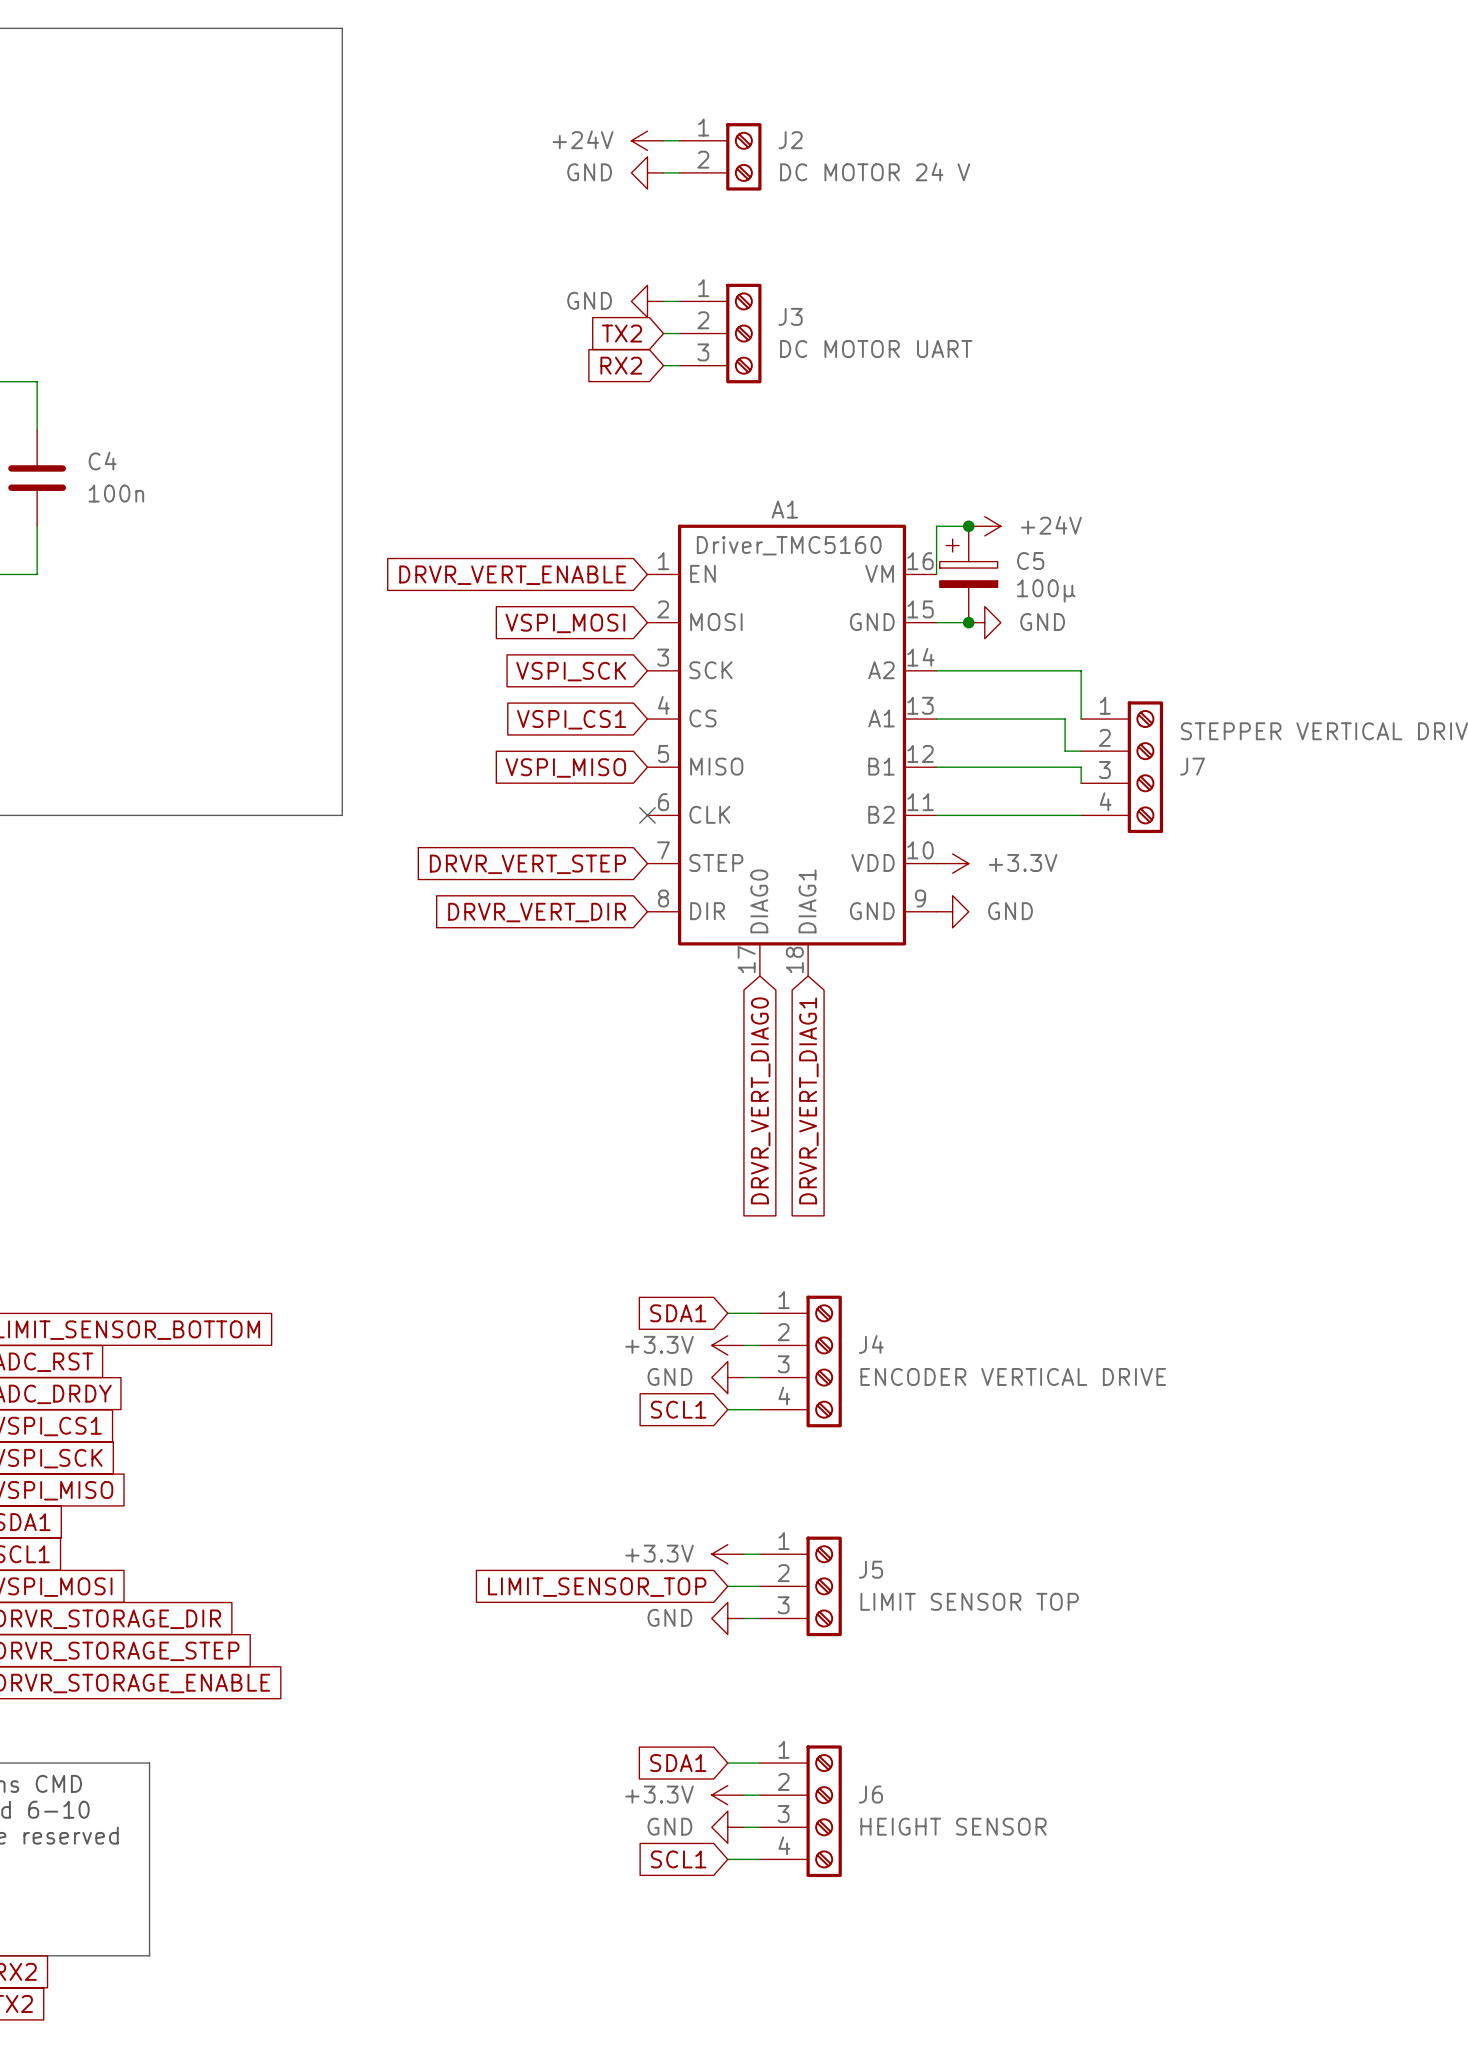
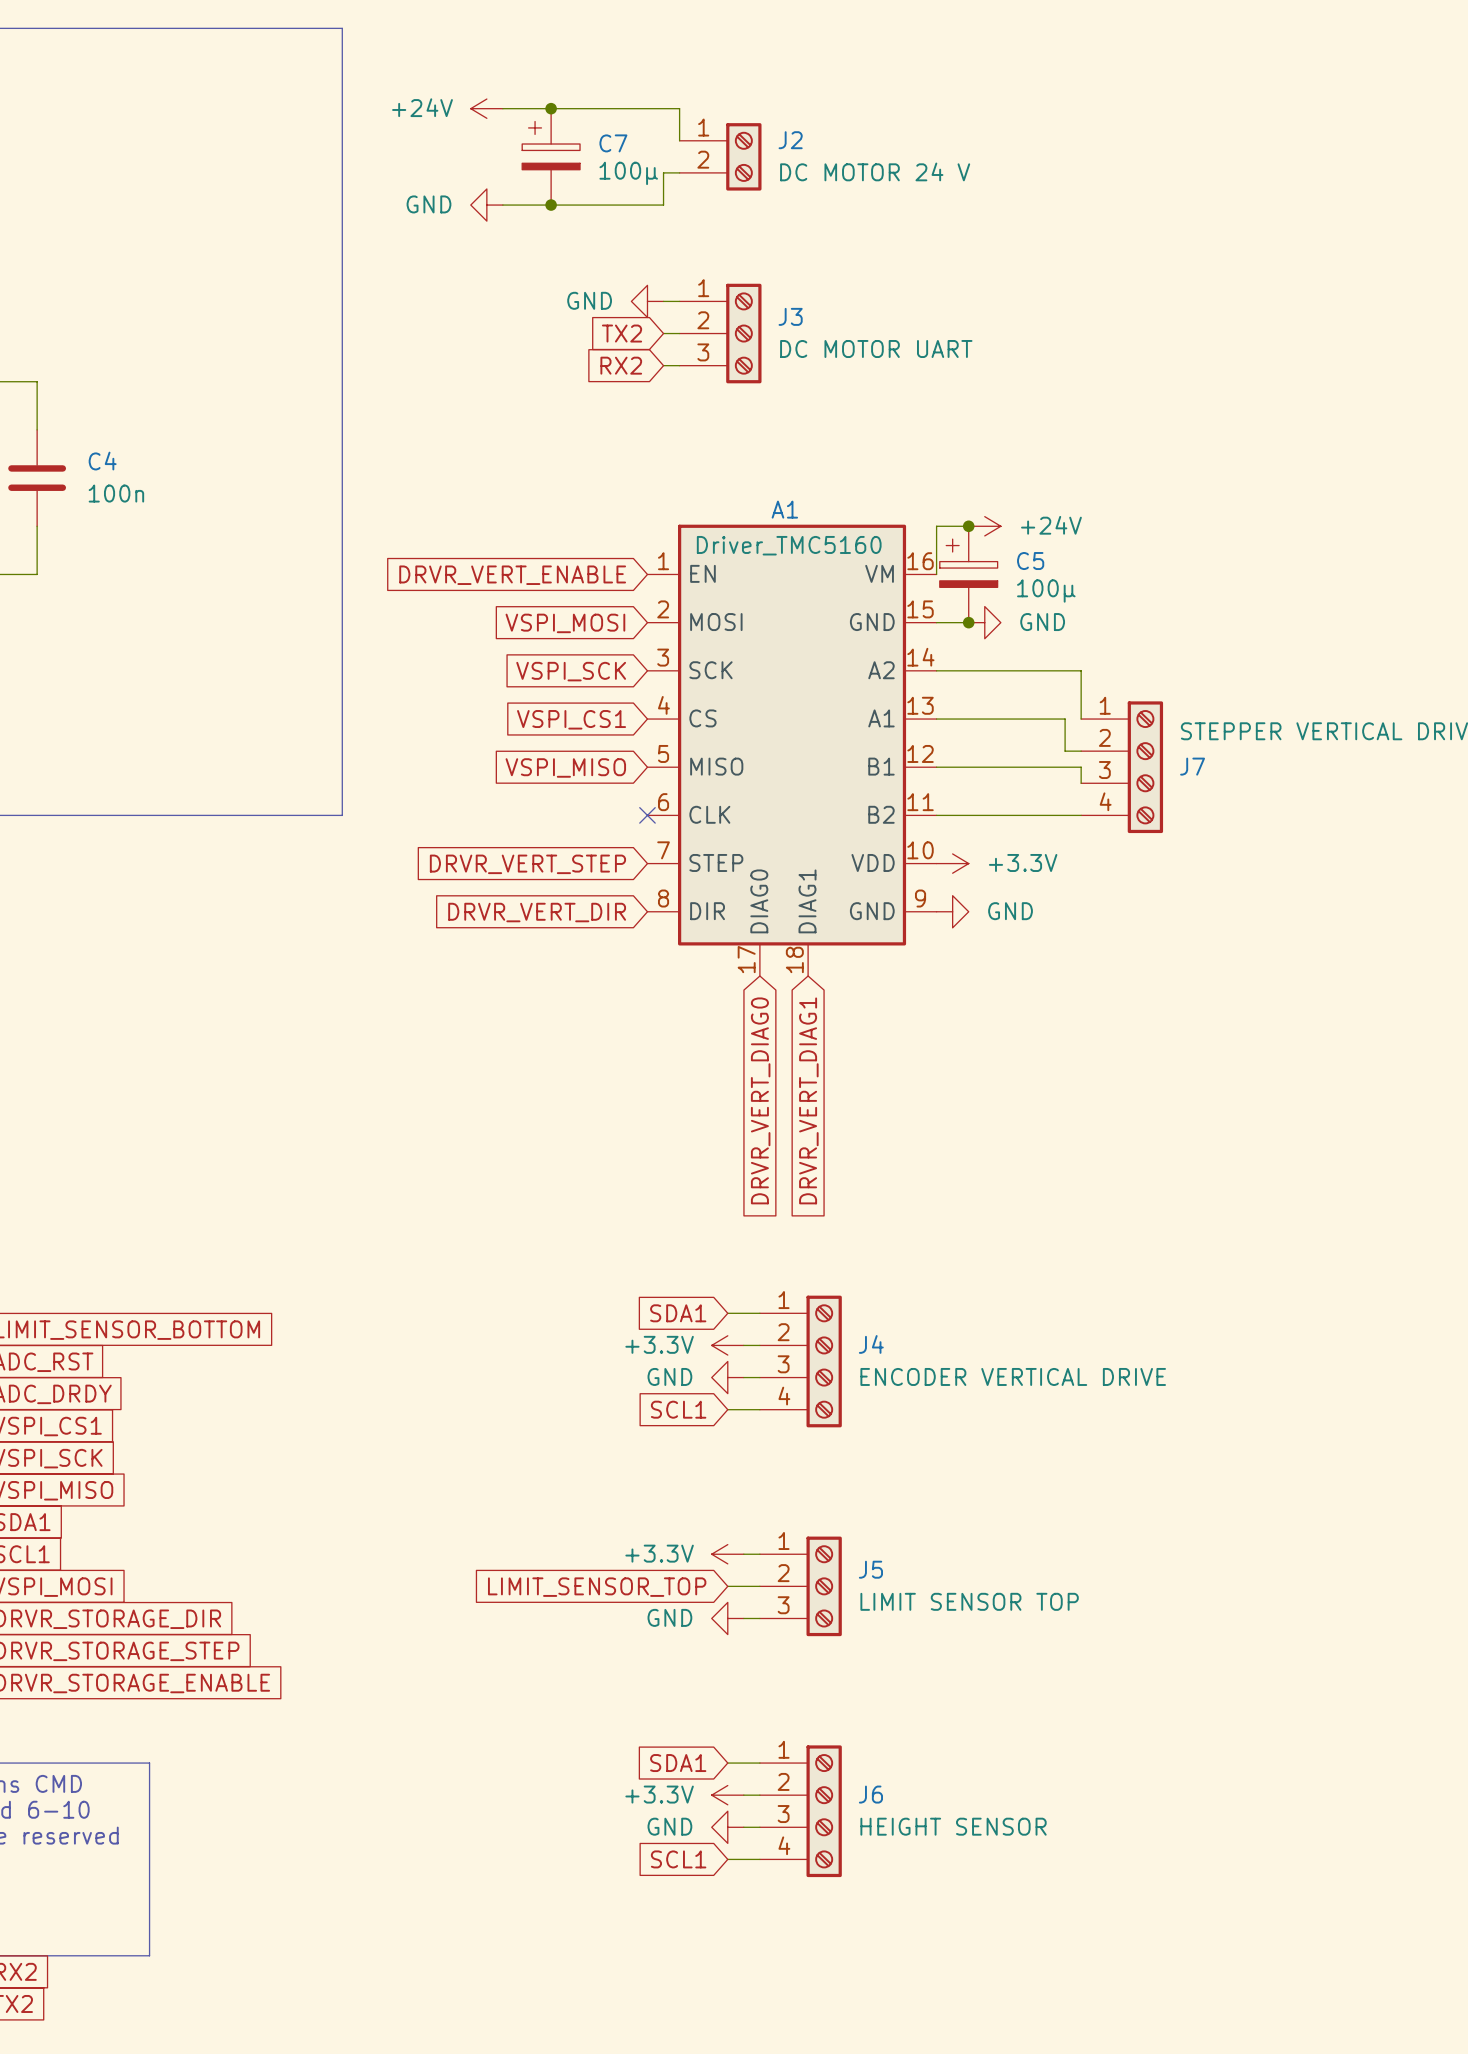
junction: none -> (551, 108)
power symbol position: +24V (647, 140) -> +24V (486, 108)
wire: (663, 140) (679, 140) -> (502, 108) (679, 108) (679, 140)
C7: none -> 100μ (551, 156)
power symbol position: GND (647, 172) -> GND (486, 205)
wire: none -> (663, 172) (663, 205) (502, 205)
junction: none -> (551, 205)

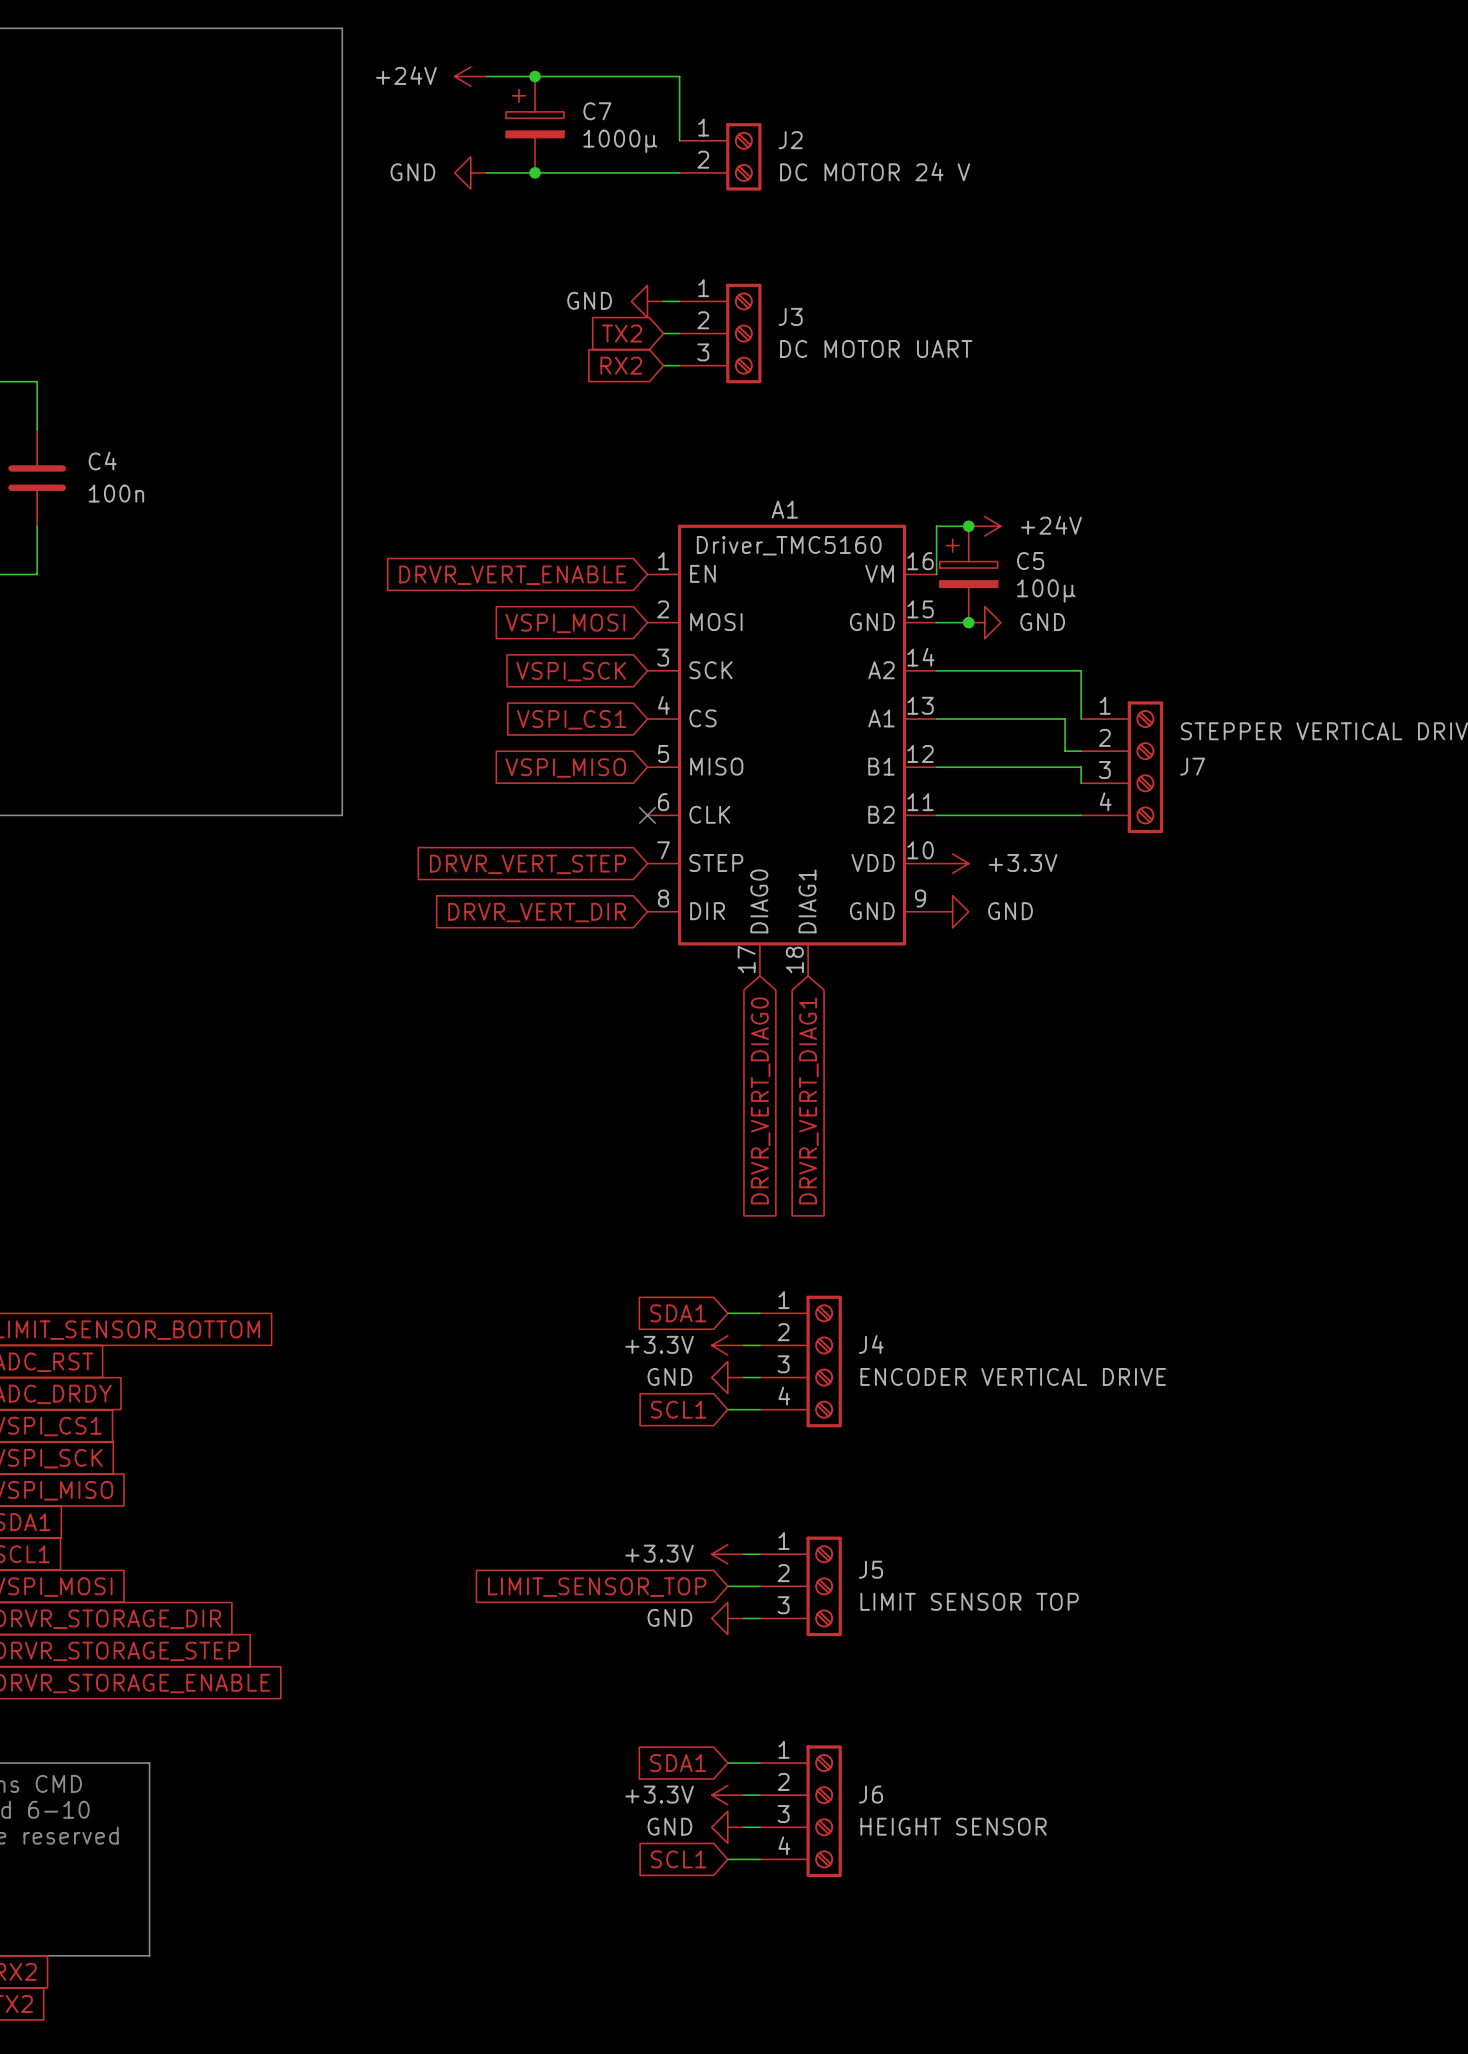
junction: none -> (535, 76)
power symbol position: +24V (486, 108) -> +24V (470, 76)
wire: (502, 108) (679, 108) -> (486, 76) (679, 76) (679, 108)
junction: (551, 108) -> none
C7 position: (551, 156) -> (535, 124)
junction: none -> (535, 172)
wire: (663, 172) (663, 205) (502, 205) -> (663, 172) (486, 172)
C7 value: 100μ (628, 173) -> 1000μ (620, 141)
power symbol position: GND (486, 205) -> GND (470, 172)
junction: (551, 205) -> none

